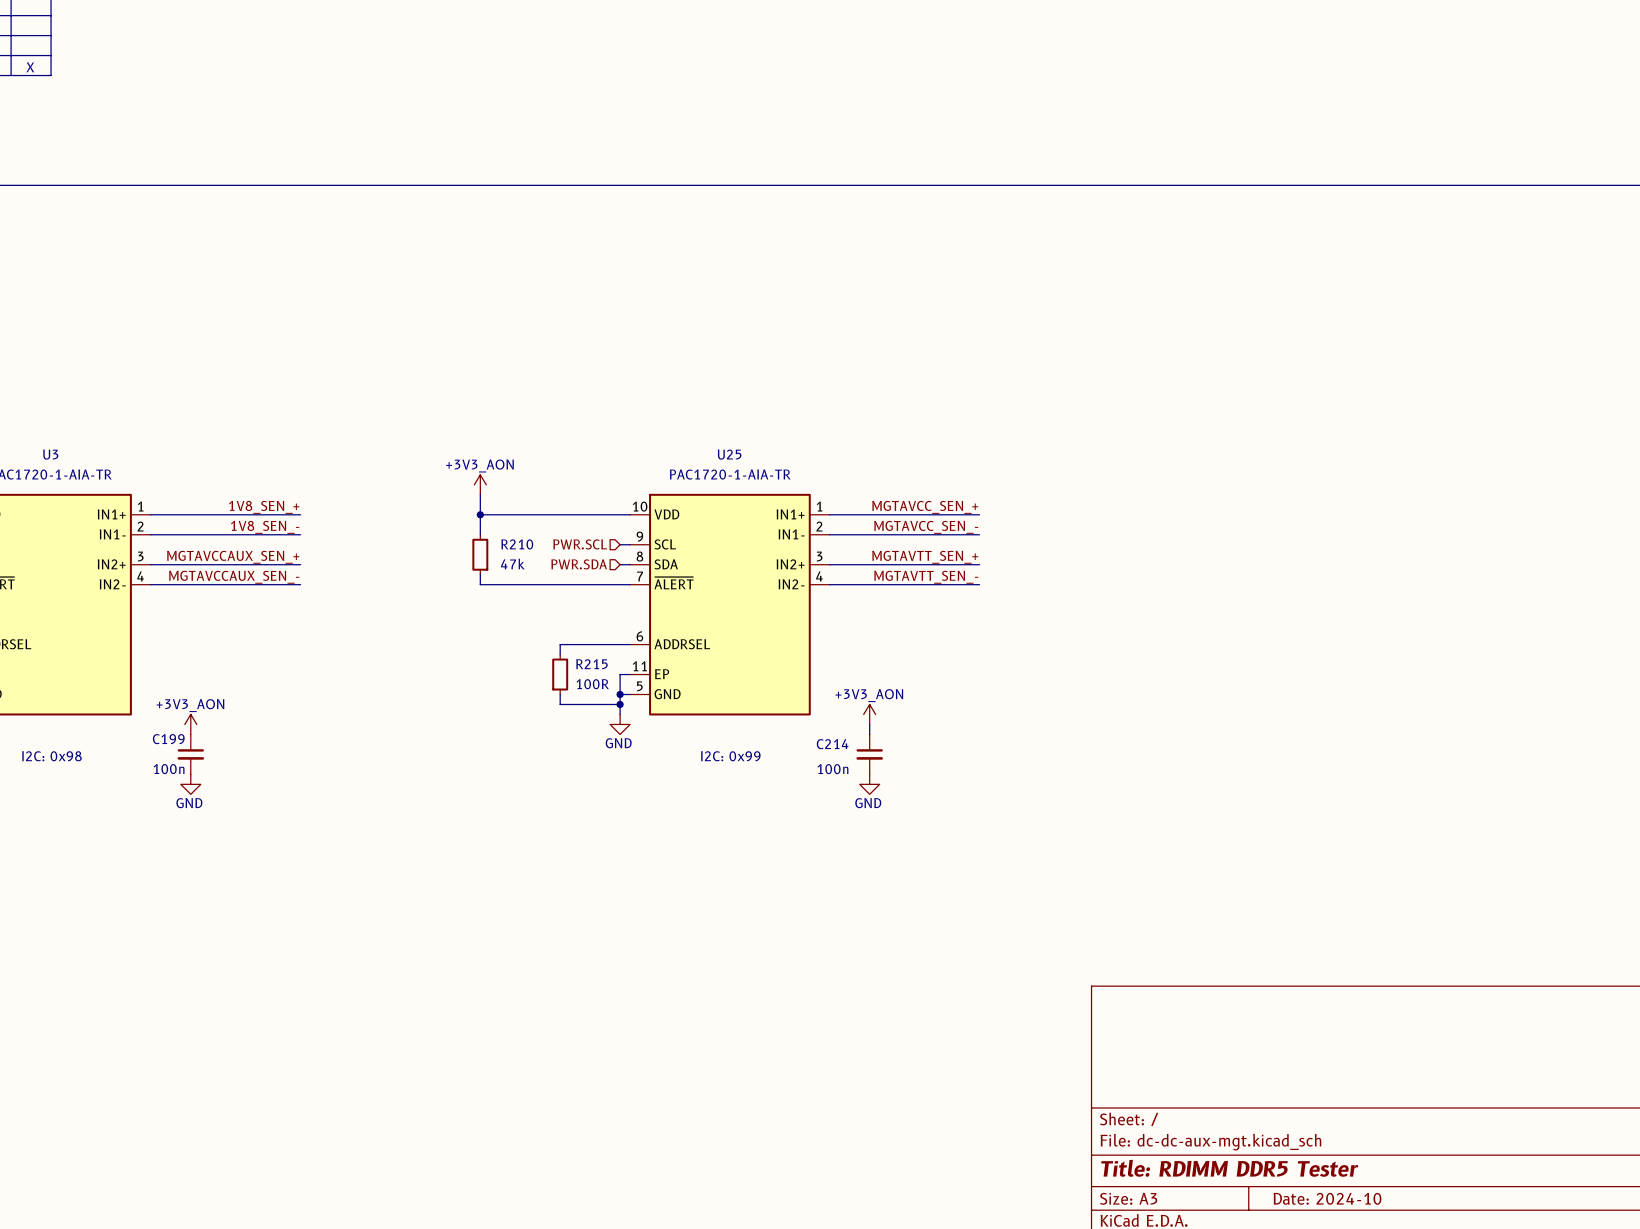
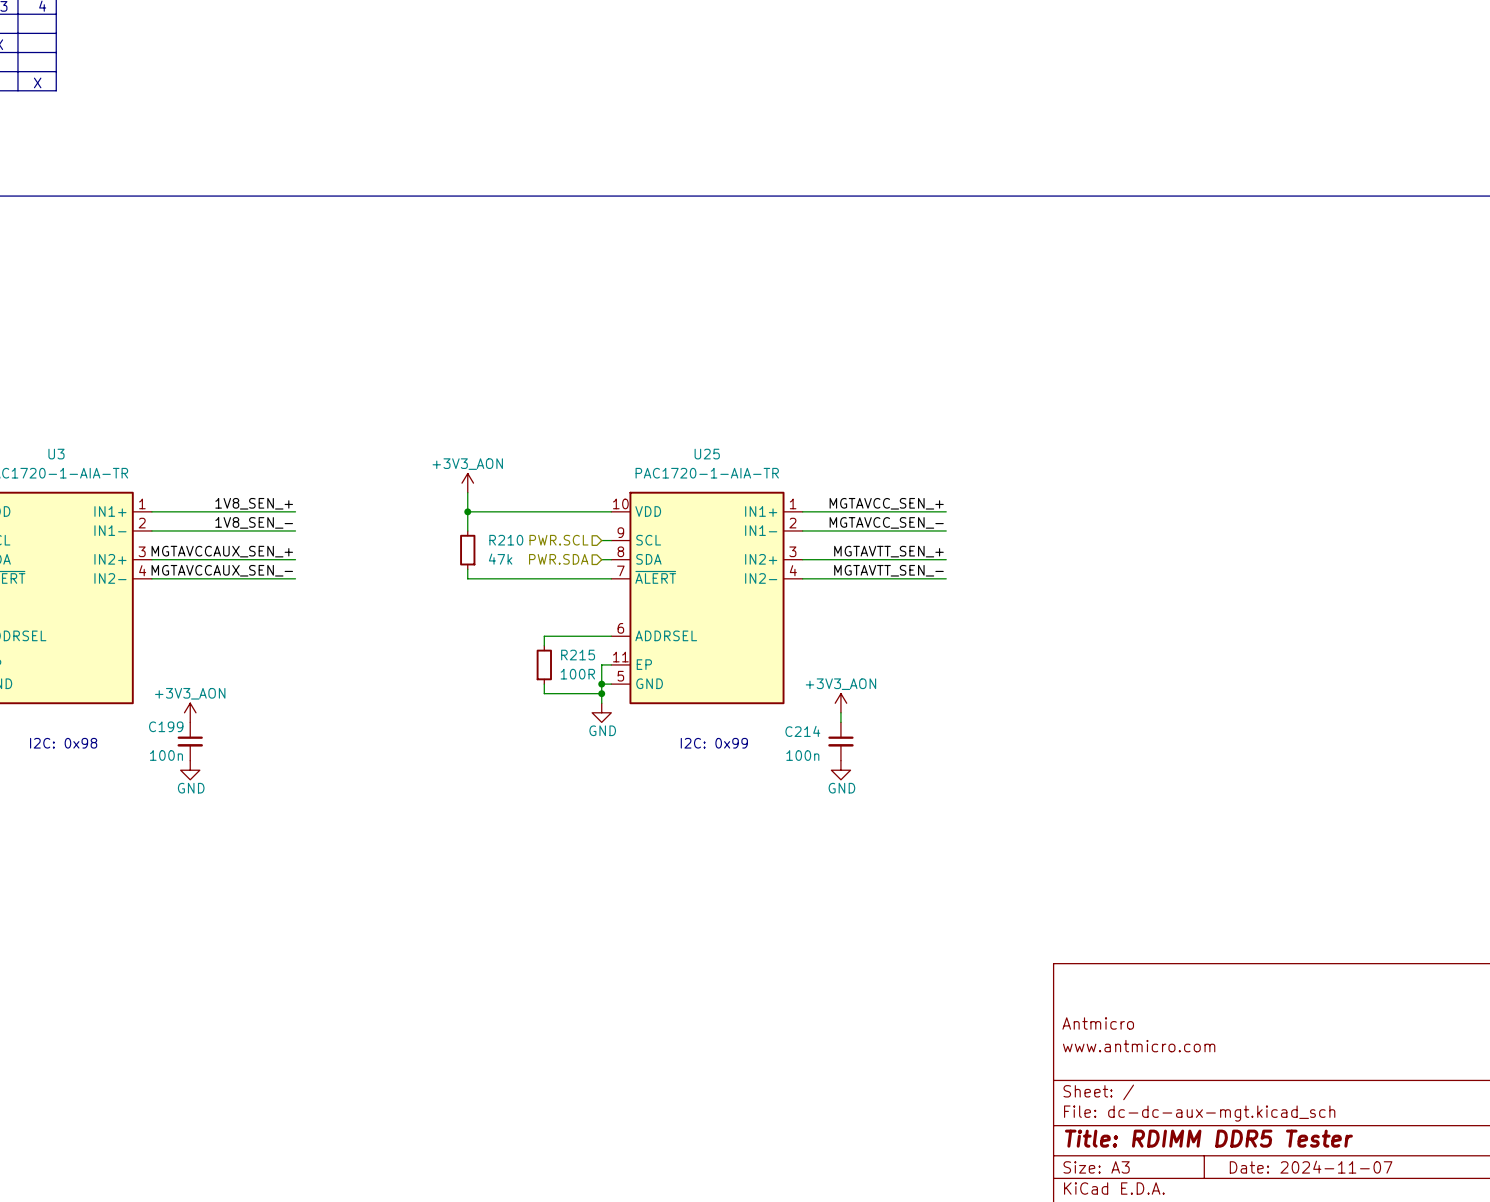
title block: none -> Antmicro (1098, 1023)
title block: none -> www.antmicro.com (1139, 1046)
title block: Date: 2024-10 (1327, 1198) -> Date: 2024-11-07 (1311, 1167)

